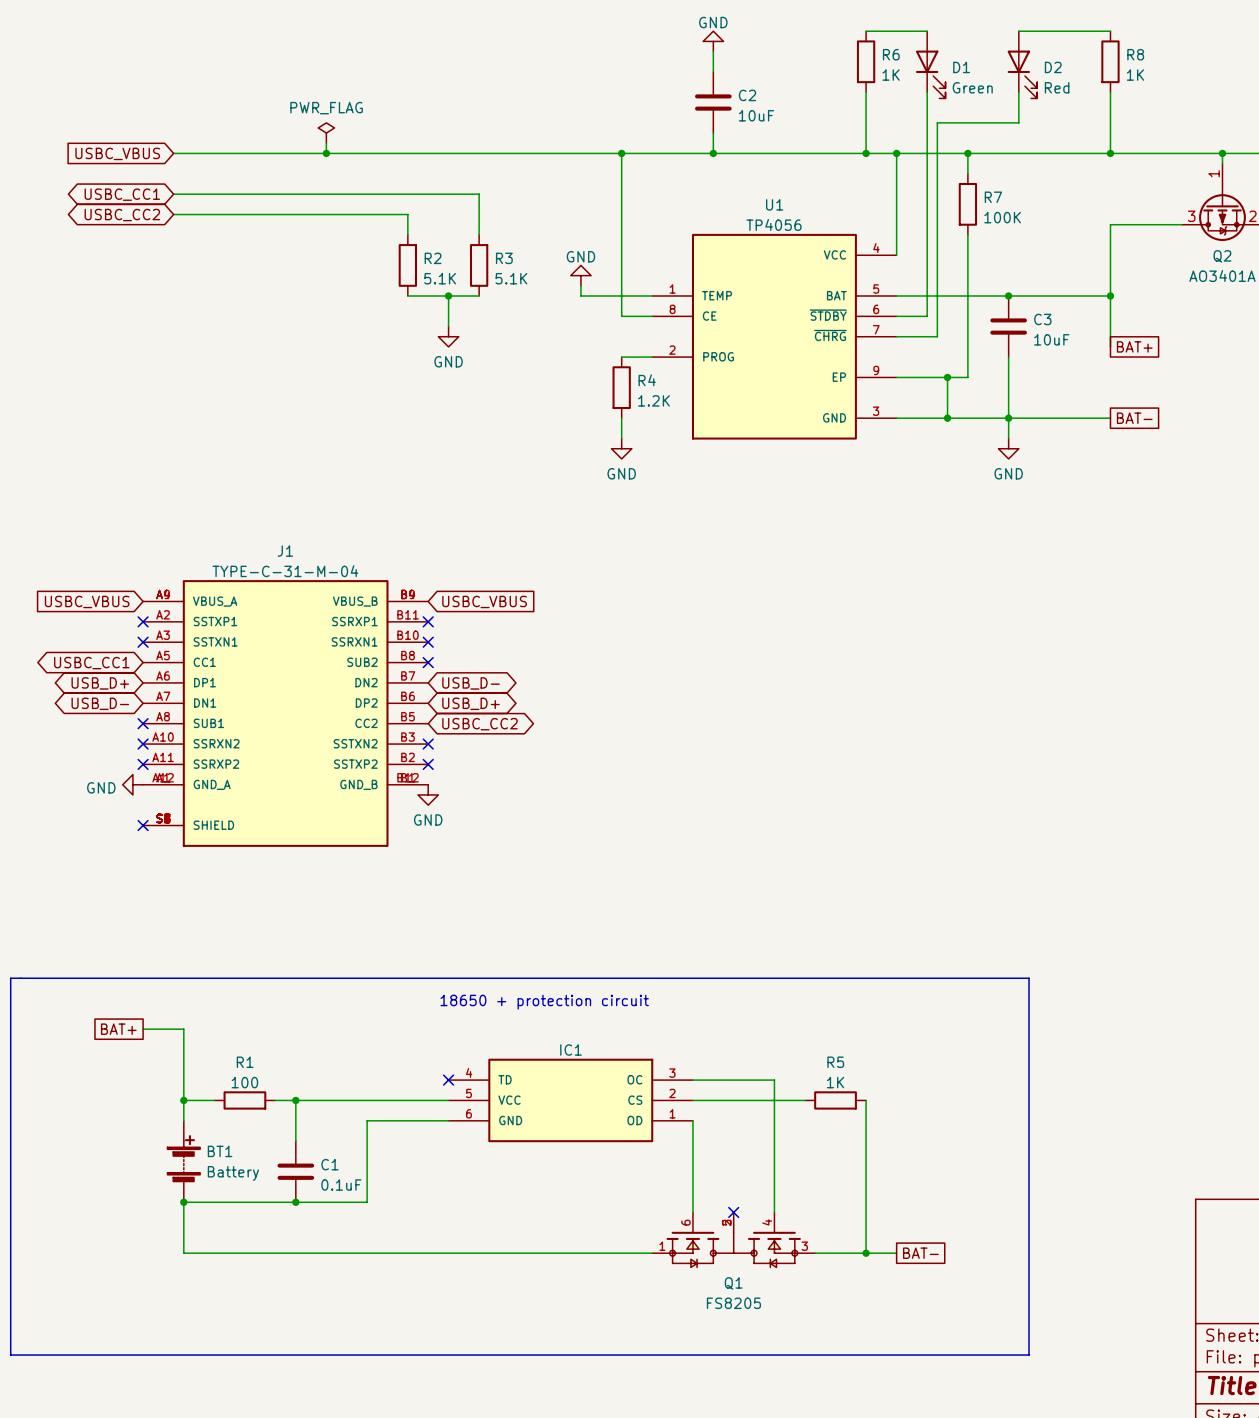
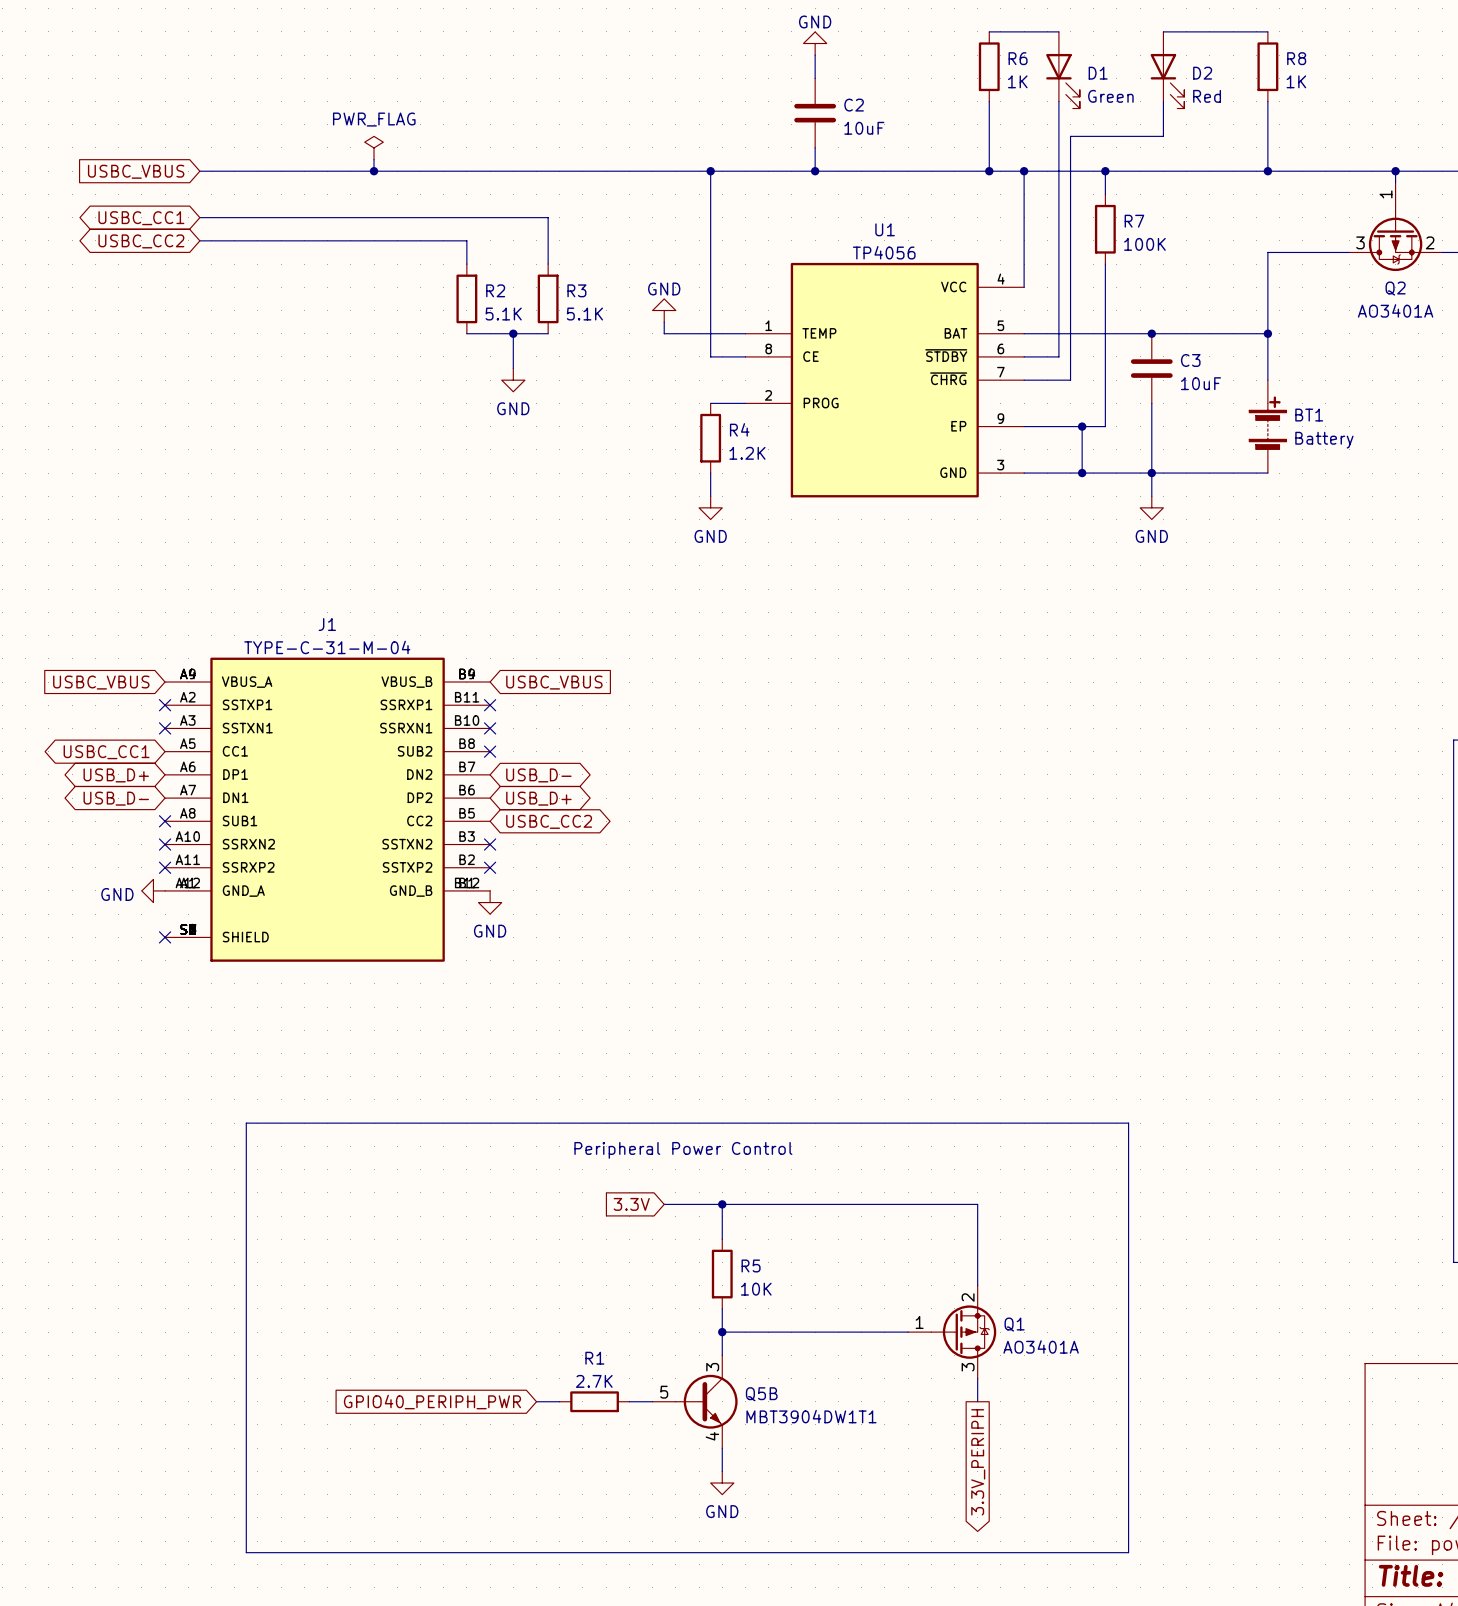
global label: BAT+ (1134, 346) -> none
global label: BAT- (1134, 418) -> none
line: (10, 978) (1029, 978) (1029, 1355) (10, 1355) (10, 978) -> (246, 1123) (246, 1552) (1128, 1552) (1128, 1123) (246, 1123)
text: 18650 + protection circuit (544, 1002) -> none
text: none -> Peripheral Power Control (683, 1150)
global label: BAT+ (118, 1029) -> none
wire: (143, 1029) (183, 1029) (183, 1120) -> none
global label: none -> 3.3V (631, 1204)
wire: none -> (664, 1204) (977, 1204) (977, 1285)
junction: none -> (722, 1204)
no-connect mark: (448, 1080) -> none
wire: (692, 1080) (774, 1080) (774, 1212) -> none
R1 value: 100 (244, 1082) -> 2.7K (594, 1381)
R5 value: 1K (835, 1082) -> 10K (756, 1289)
wire: (183, 1100) (214, 1100) -> none
junction: (183, 1100) -> none
R1 position: (244, 1100) -> (594, 1401)
wire: (275, 1100) (448, 1100) -> none
wire: (295, 1100) (295, 1141) -> none
junction: (295, 1100) -> none
IC1: (570, 1100) -> none
wire: (692, 1100) (804, 1100) -> none
R5 rotation: 0° (835, 1100) -> 90° clockwise (722, 1274)
R5 position: (835, 1100) -> (722, 1274)
wire: (866, 1100) (866, 1253) -> none
wire: (448, 1120) (367, 1120) (367, 1202) (183, 1202) (183, 1253) (652, 1253) -> none
wire: (692, 1120) (692, 1212) -> none
wire: none -> (722, 1308) (722, 1355)
BT1 position: (183, 1161) -> (1267, 426)
C1: 0.1uF (295, 1171) -> none
wire: none -> (722, 1332) (908, 1332)
junction: none -> (722, 1332)
junction: (183, 1202) -> none
junction: (295, 1202) -> none
Q1 symbol: [652, 1212, 816, 1269] -> [908, 1285, 997, 1379]
no-connect mark: (733, 1212) -> none
wire: none -> (977, 1378) (977, 1401)
wire: none -> (536, 1401) (559, 1401)
wire: none -> (629, 1401) (652, 1401)
Q5B: none -> MBT3904DW1T1 (695, 1401)
global label: none -> GPIO40_PERIPH_PWR (432, 1402)
wire: (815, 1253) (896, 1253) -> none
junction: (866, 1253) -> none
global label: BAT- (920, 1253) -> none
wire: none -> (722, 1448) (722, 1471)
Q1 name position: Q1 (733, 1283) -> Q1 (1014, 1324)
global label: none -> 3.3V_PERIPH (978, 1462)
Q1 value: FS8205 (733, 1303) -> AO3401A (1041, 1346)
power symbol: none -> GND (722, 1483)

